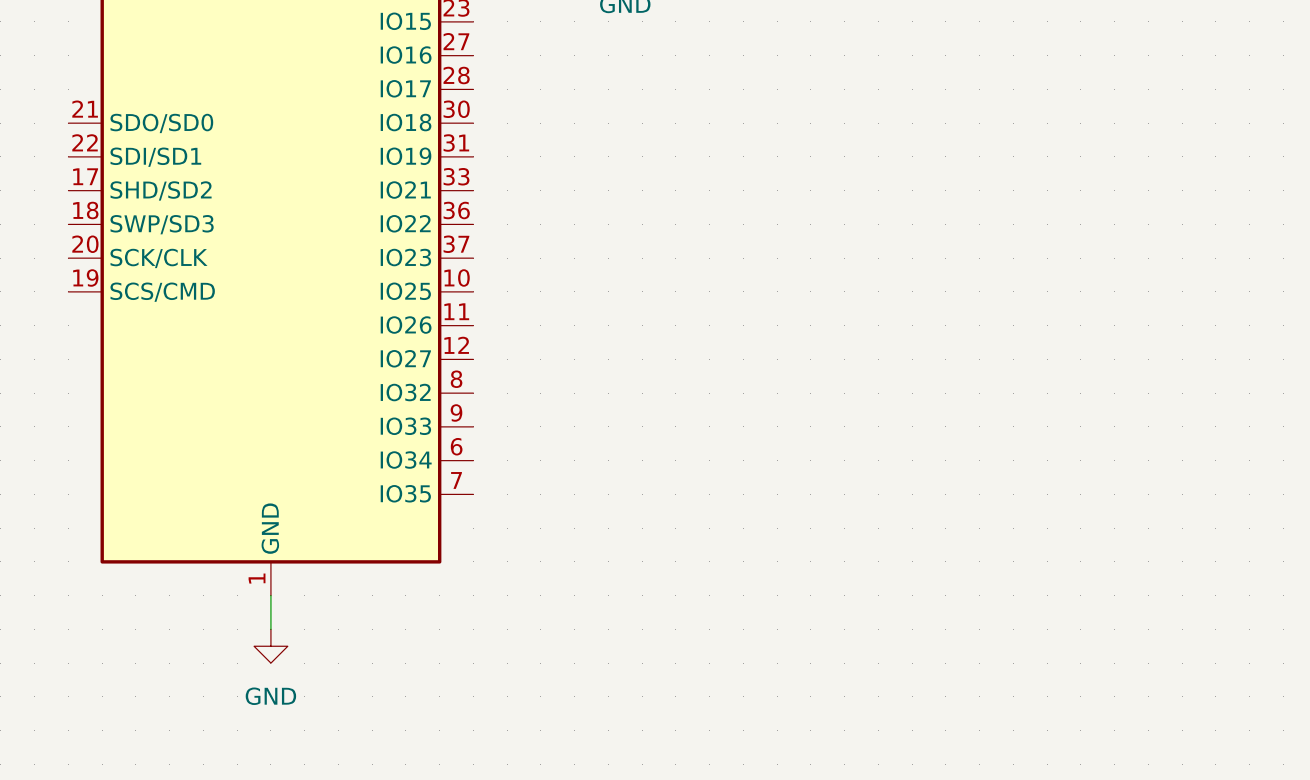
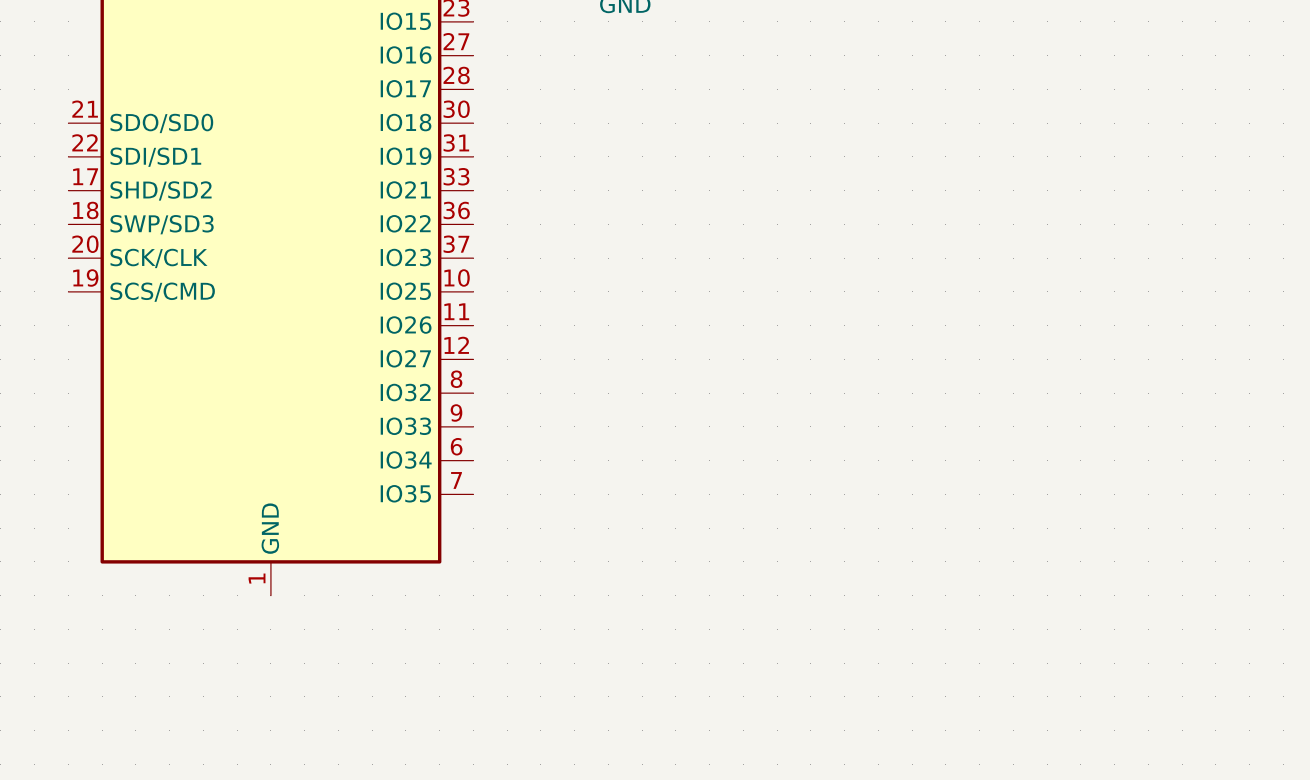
wire: (270, 595) (270, 629) -> none
power symbol: GND (270, 646) -> none

